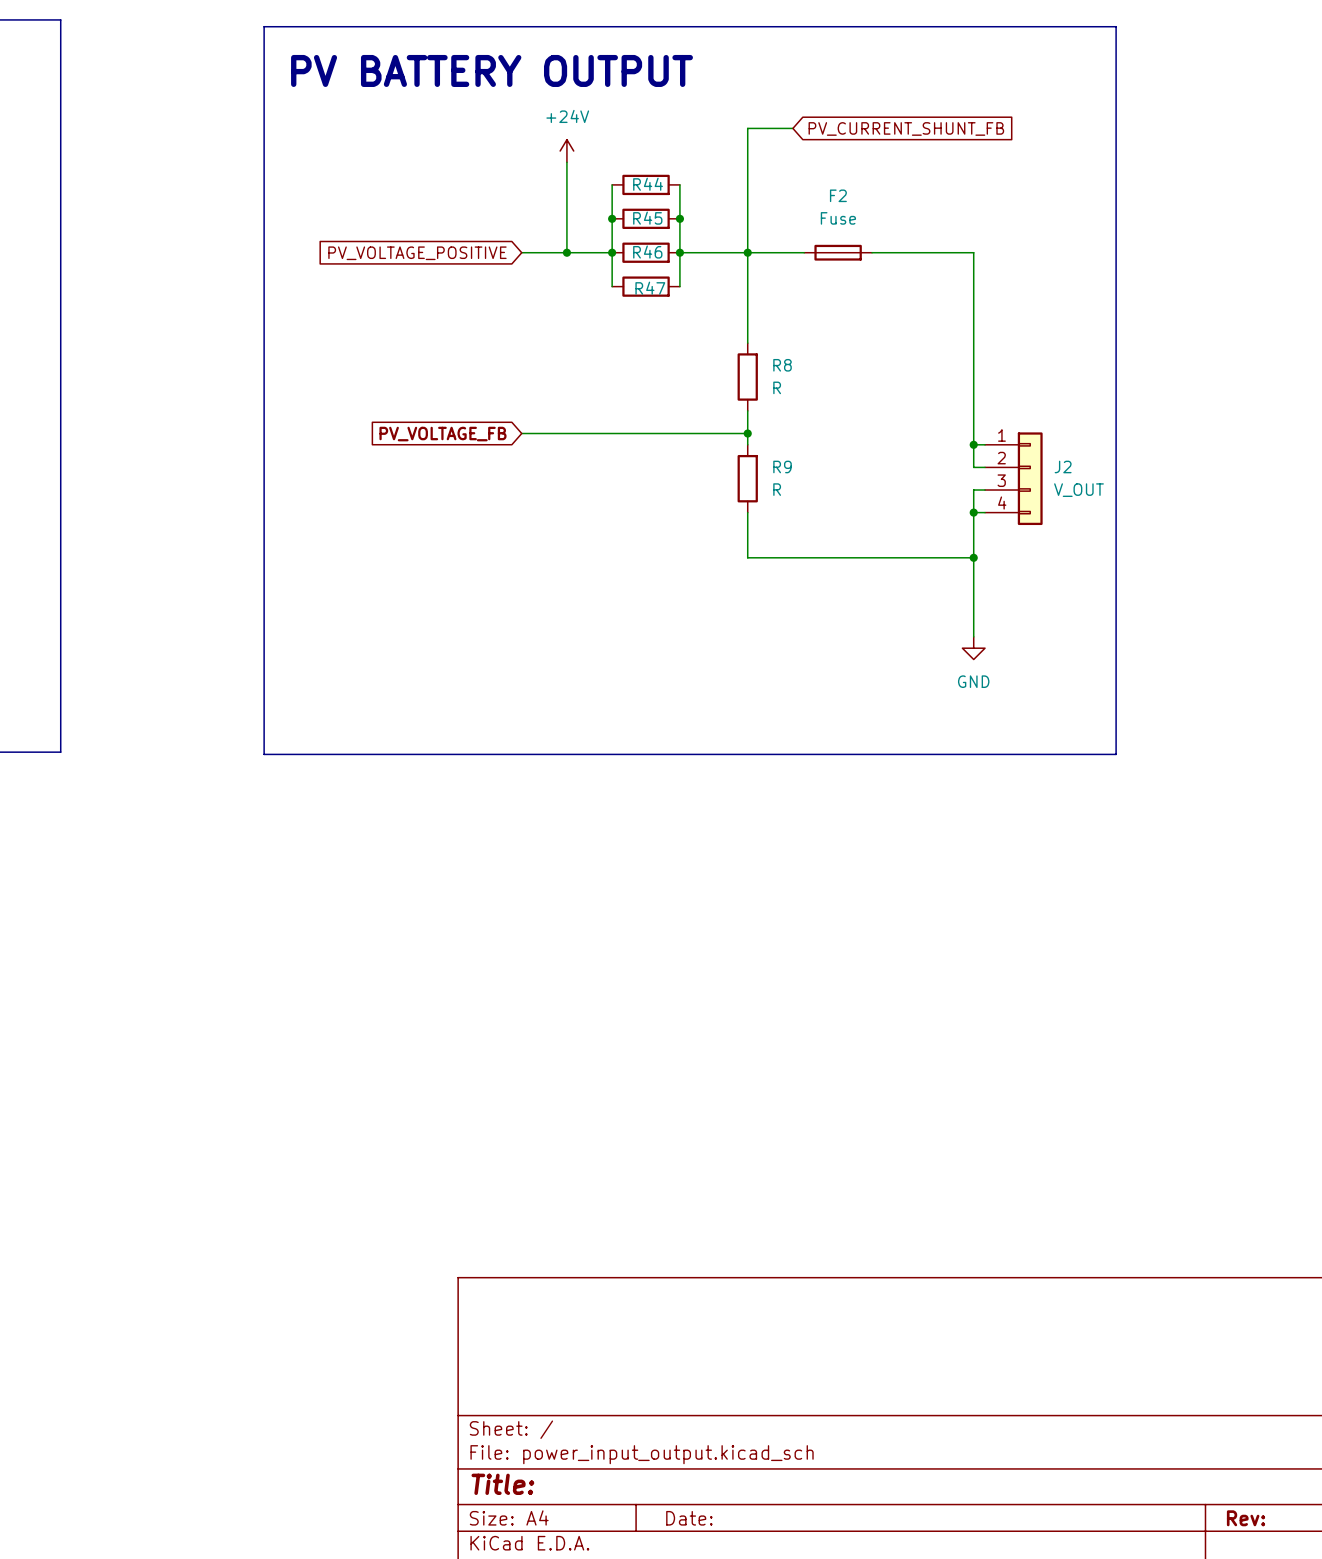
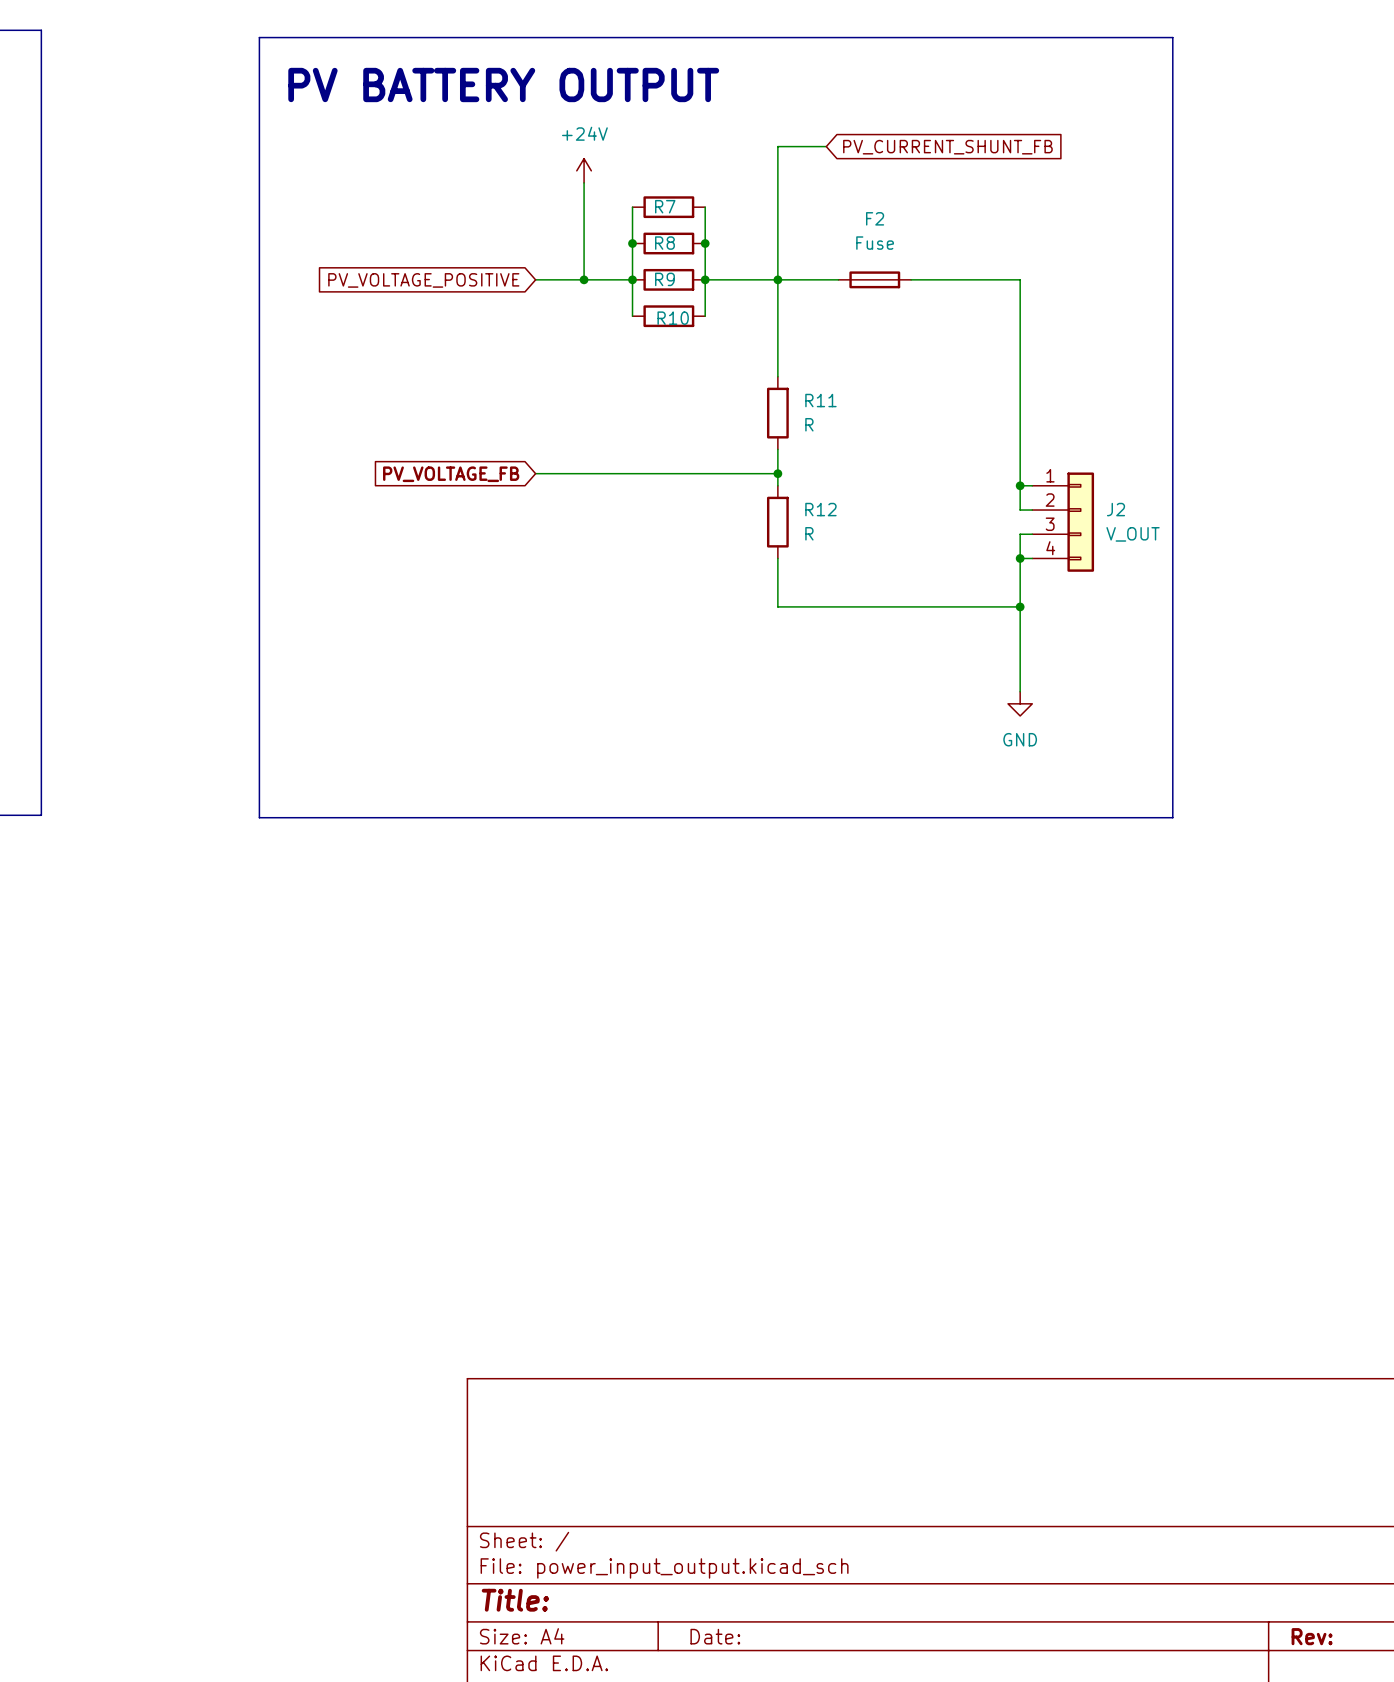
R44 name: R44 (648, 184) -> R7 (665, 206)
R45 name: R45 (647, 218) -> R8 (664, 243)
R46 name: R46 (647, 252) -> R9 (664, 279)
R47 name: R47 (650, 288) -> R10 (673, 318)
R8 name: R8 (782, 365) -> R11 (820, 400)
R9 name: R9 (782, 466) -> R12 (820, 509)

